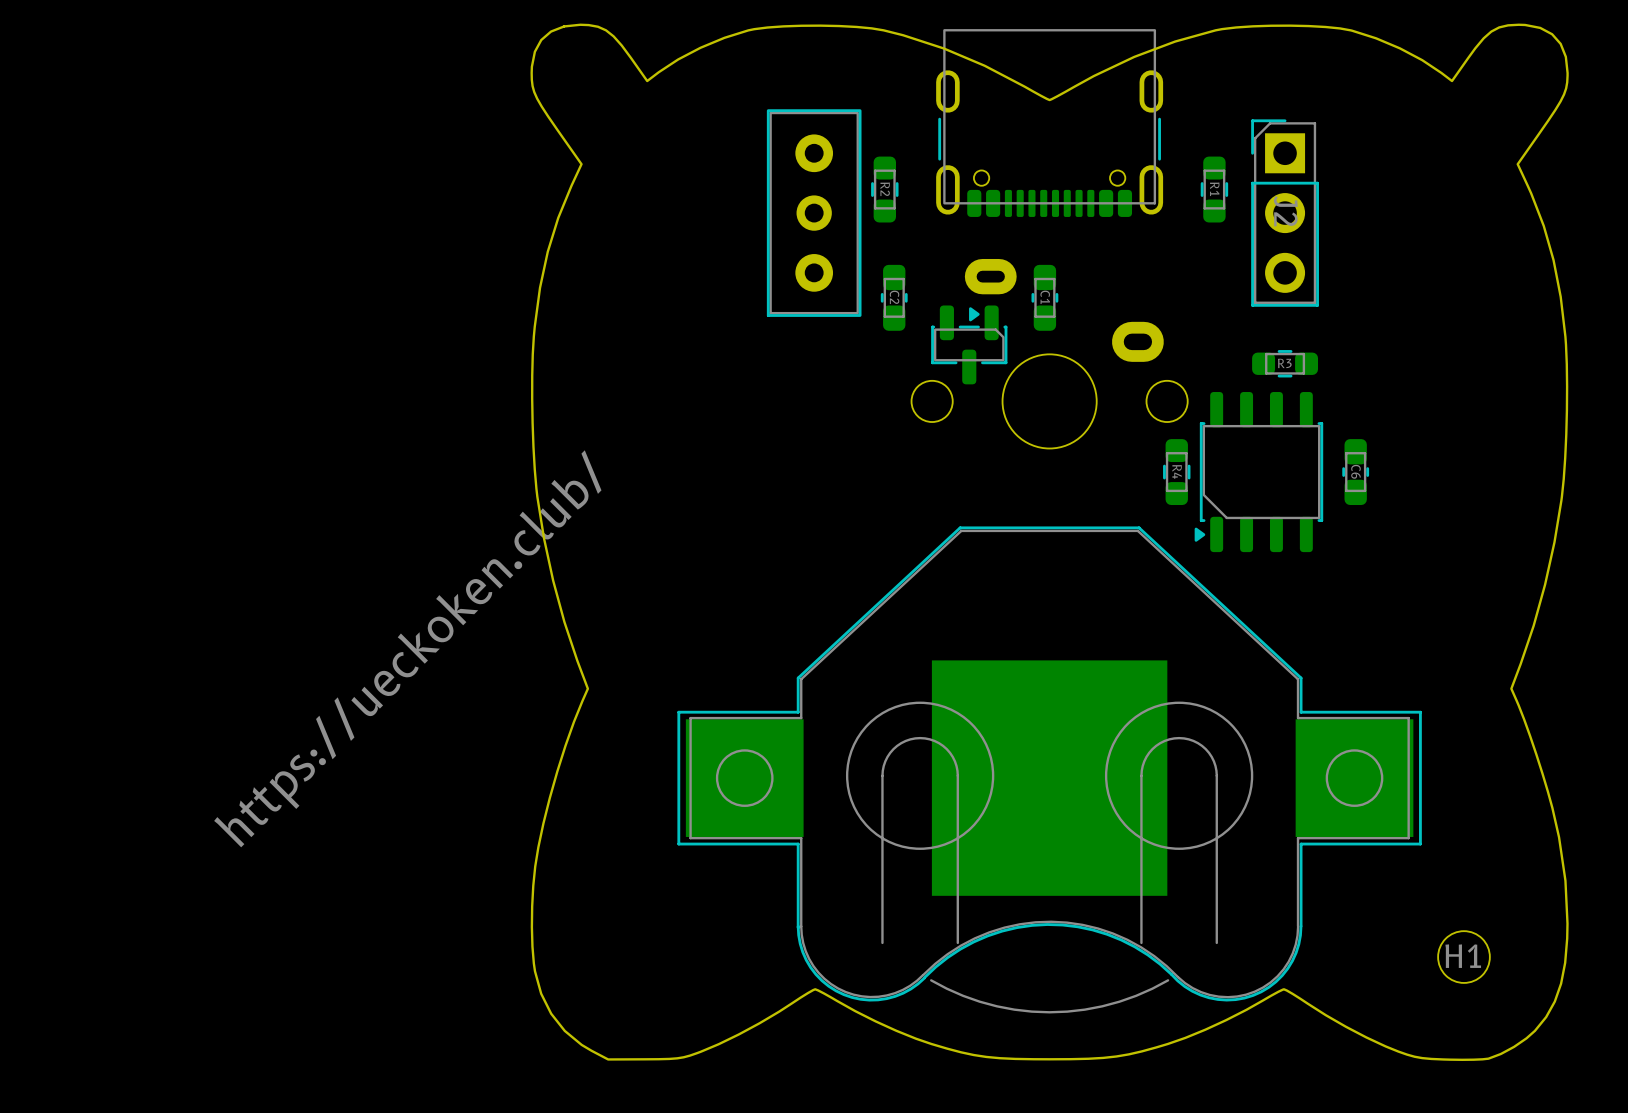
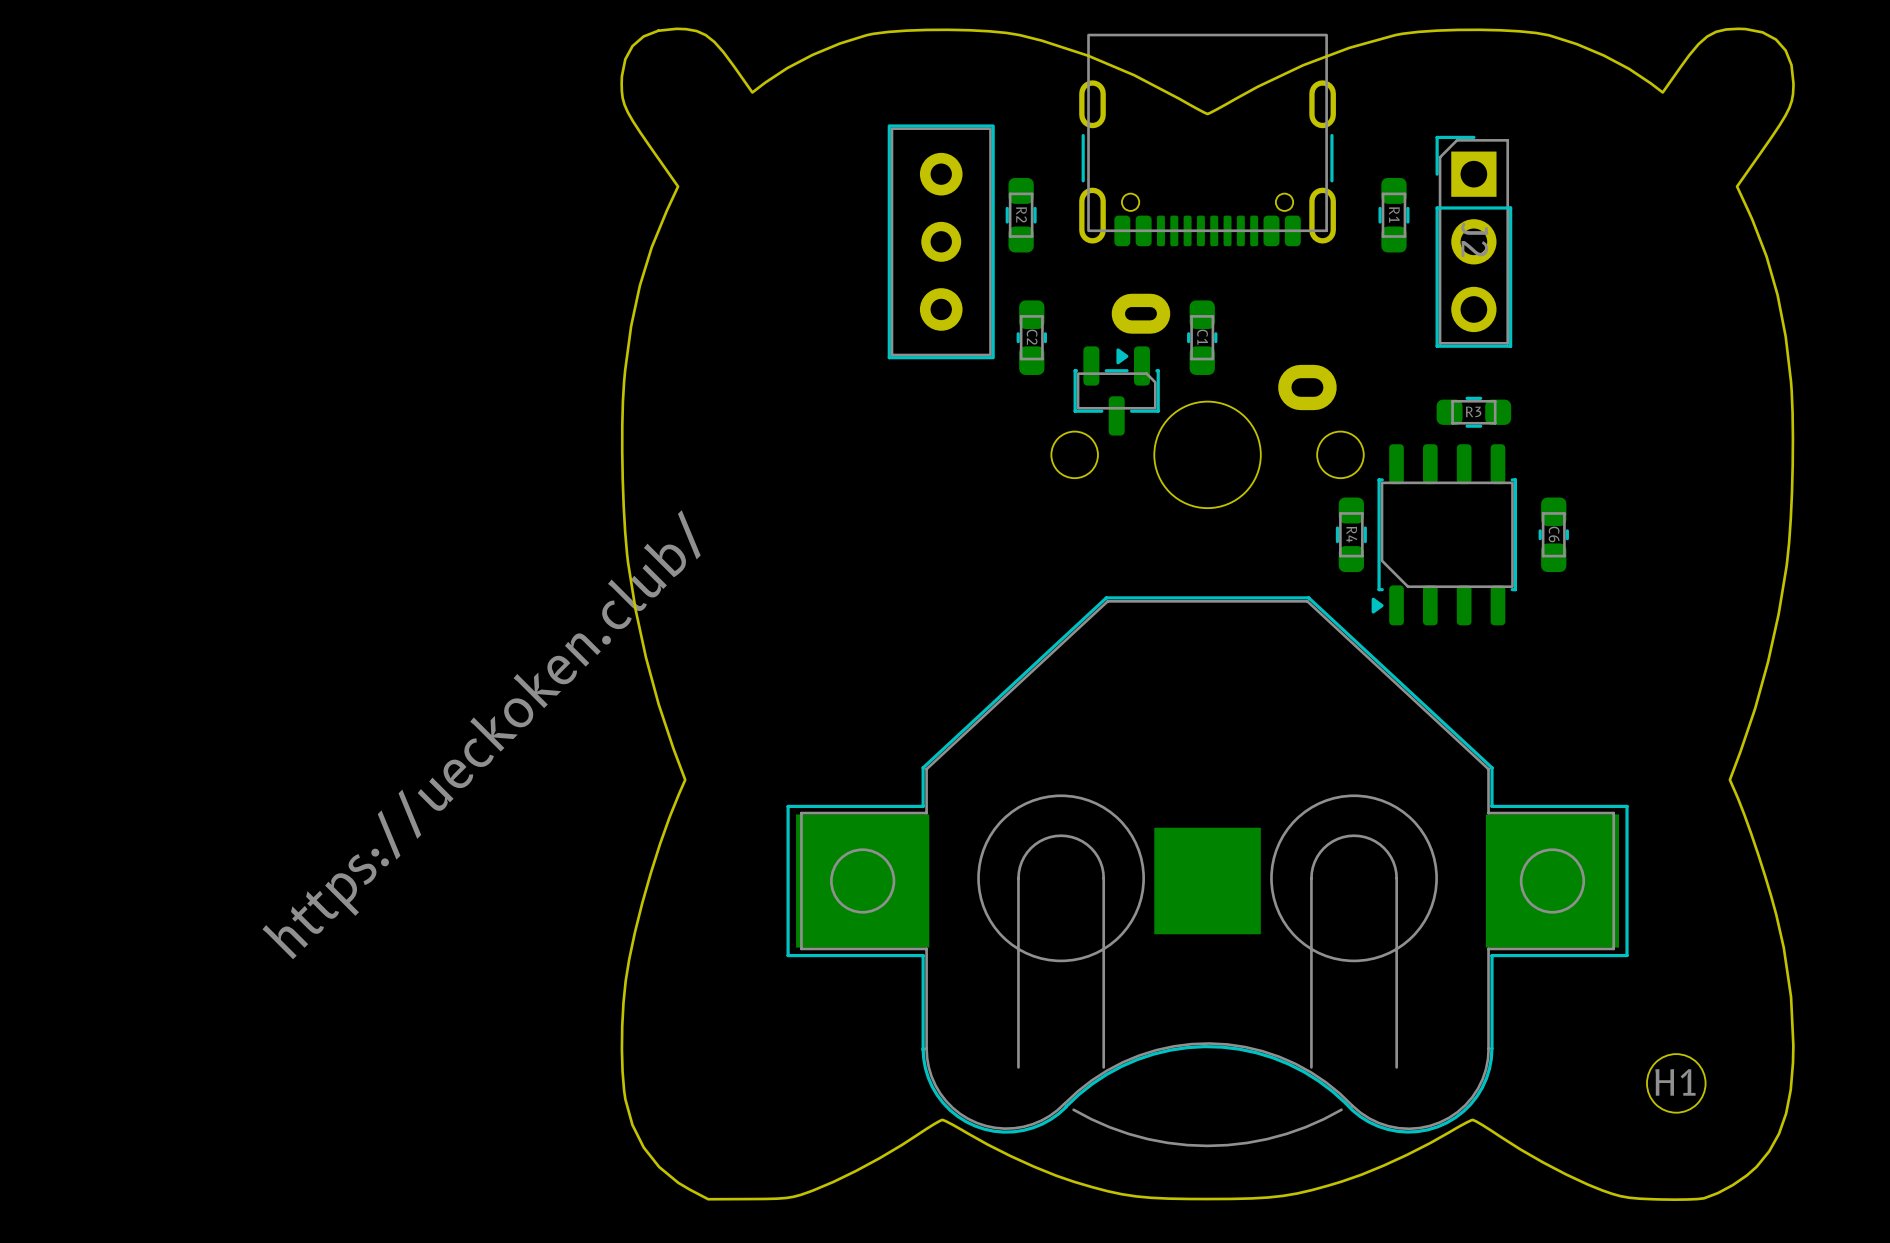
part footprint: [677, 526, 1422, 1014] -> [786, 596, 1629, 1148]

